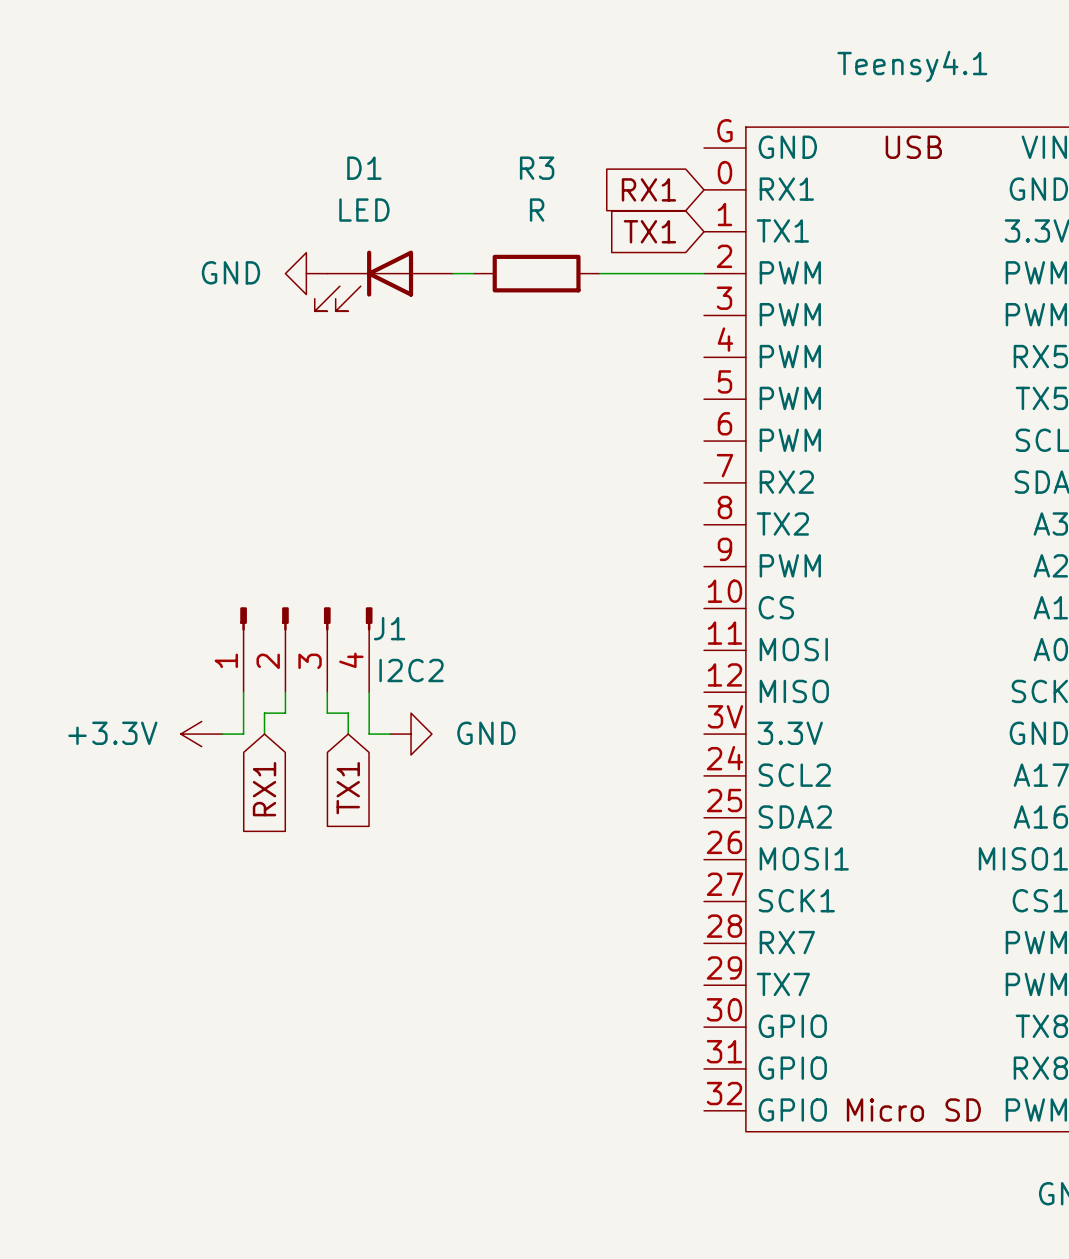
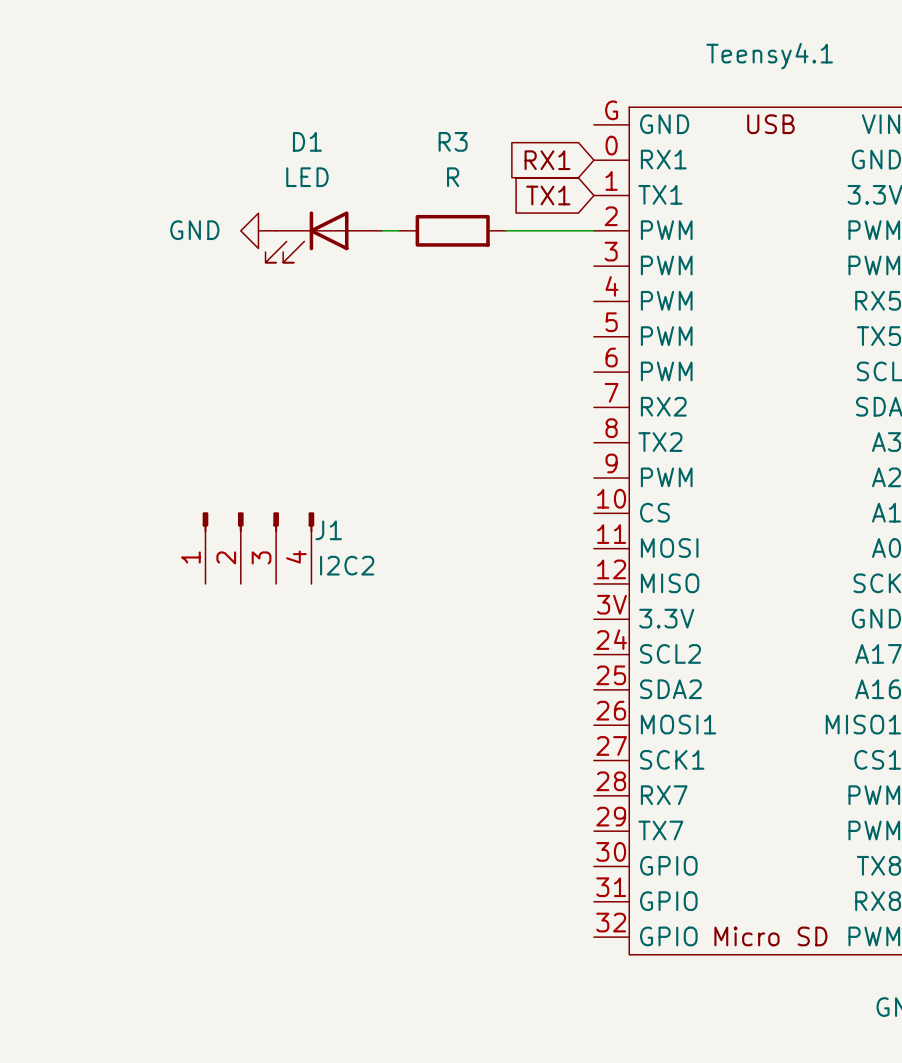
wire: (243, 692) (243, 734) (222, 734) -> none
wire: (285, 692) (285, 713) (264, 713) (264, 734) -> none
wire: (327, 692) (327, 713) (348, 713) (348, 734) -> none
wire: (369, 692) (369, 734) (390, 734) -> none
power symbol: +3.3V (201, 734) -> none
power symbol: GND (411, 734) -> none
global label: TX1 (348, 788) -> none
global label: RX1 (264, 789) -> none

